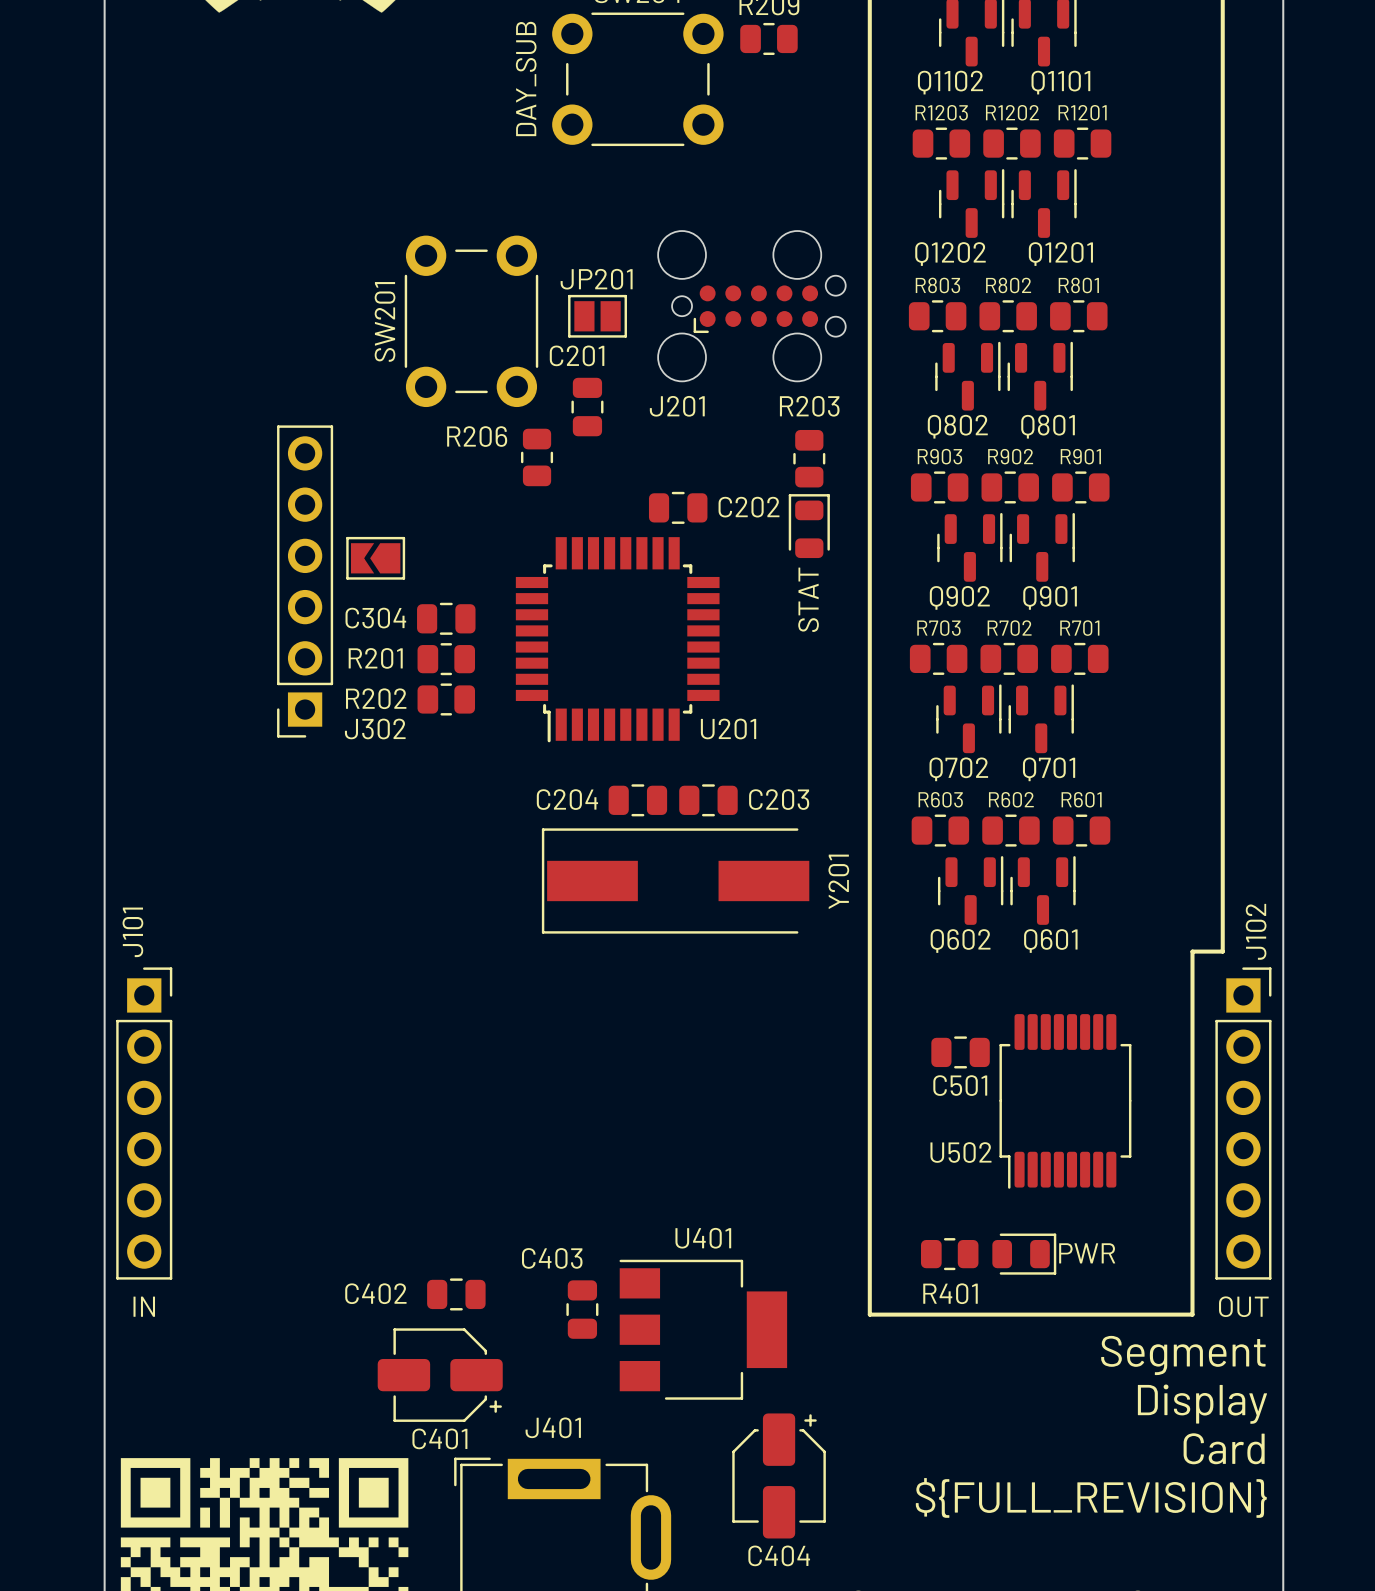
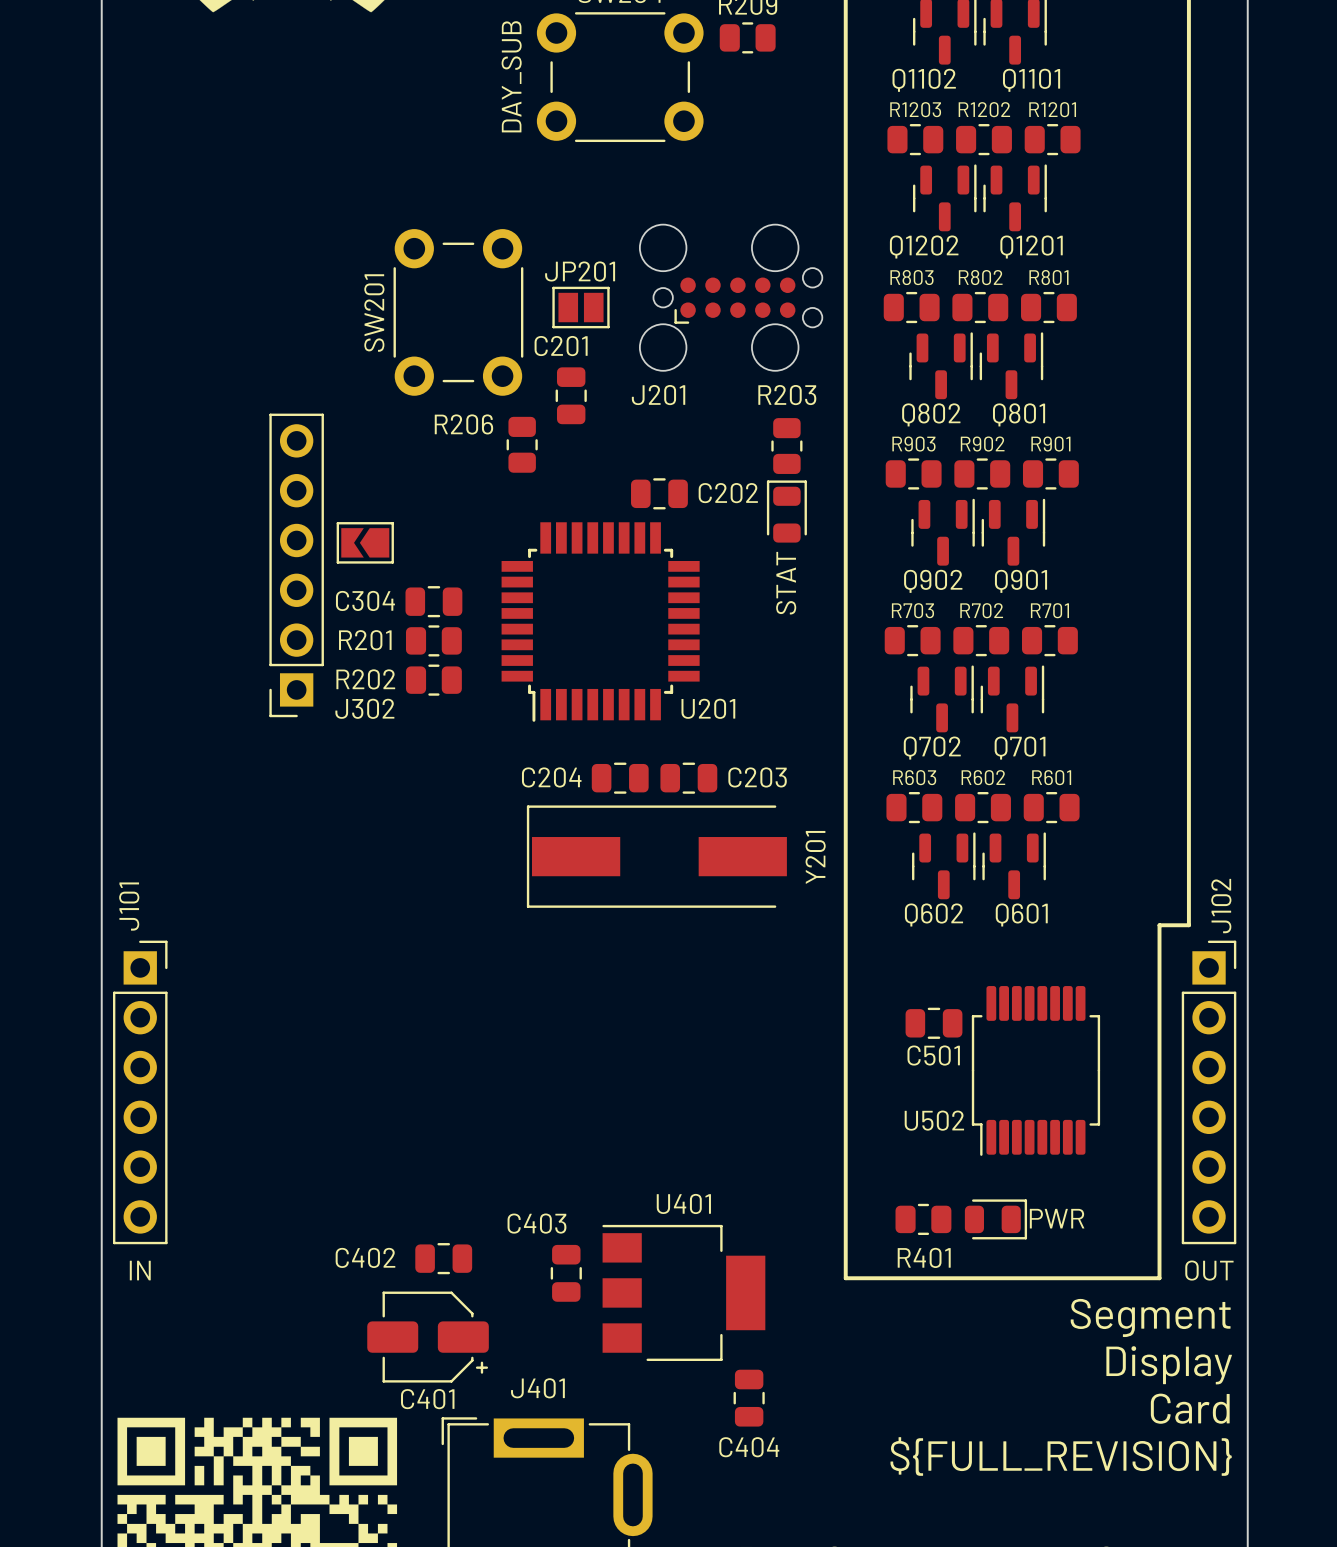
C404 footprint: [732, 1413, 826, 1539] -> [733, 1369, 765, 1427]

